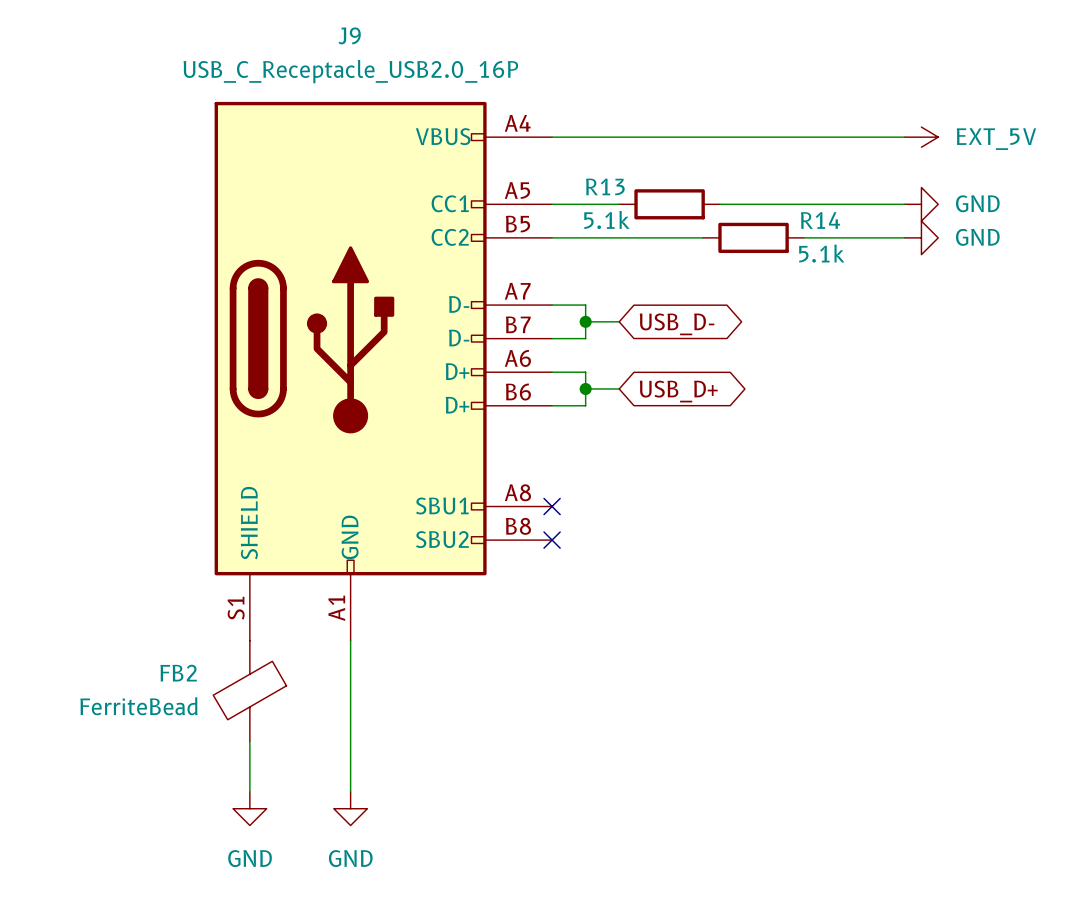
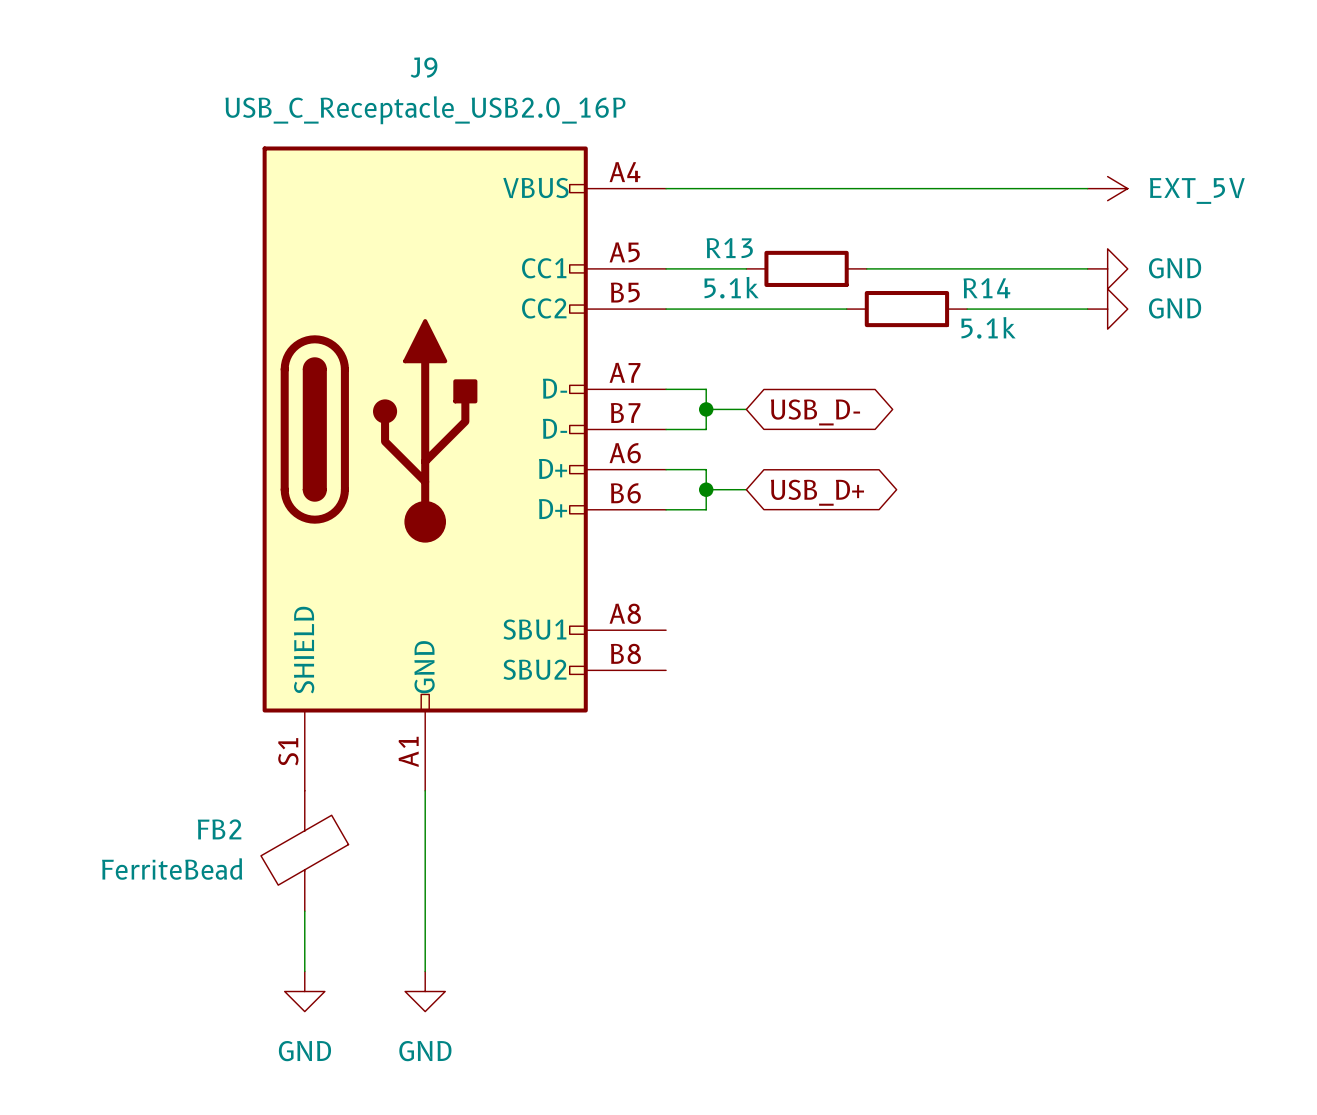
no-connect mark: (552, 506) -> none
no-connect mark: (552, 540) -> none

